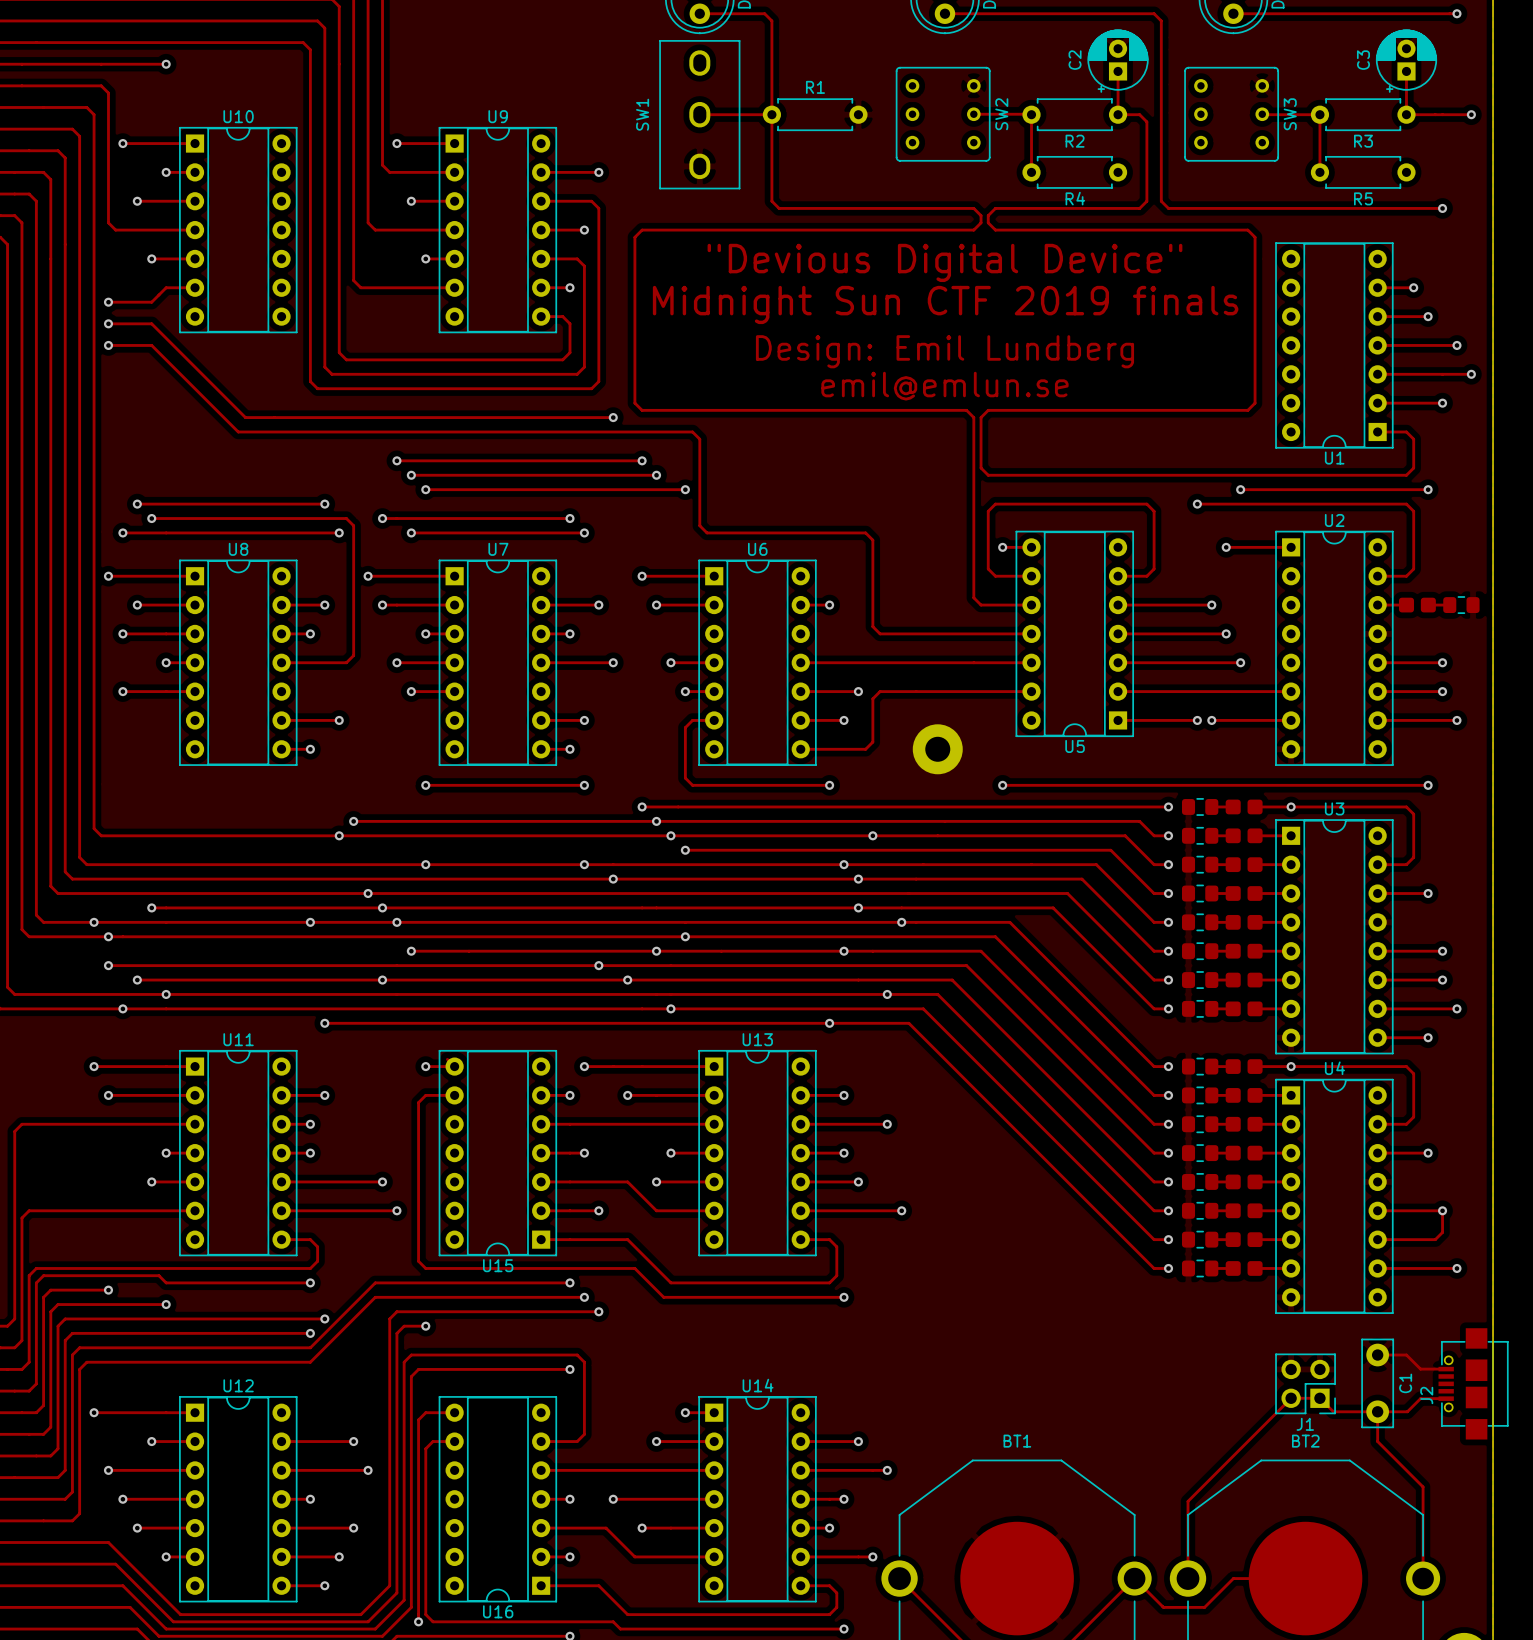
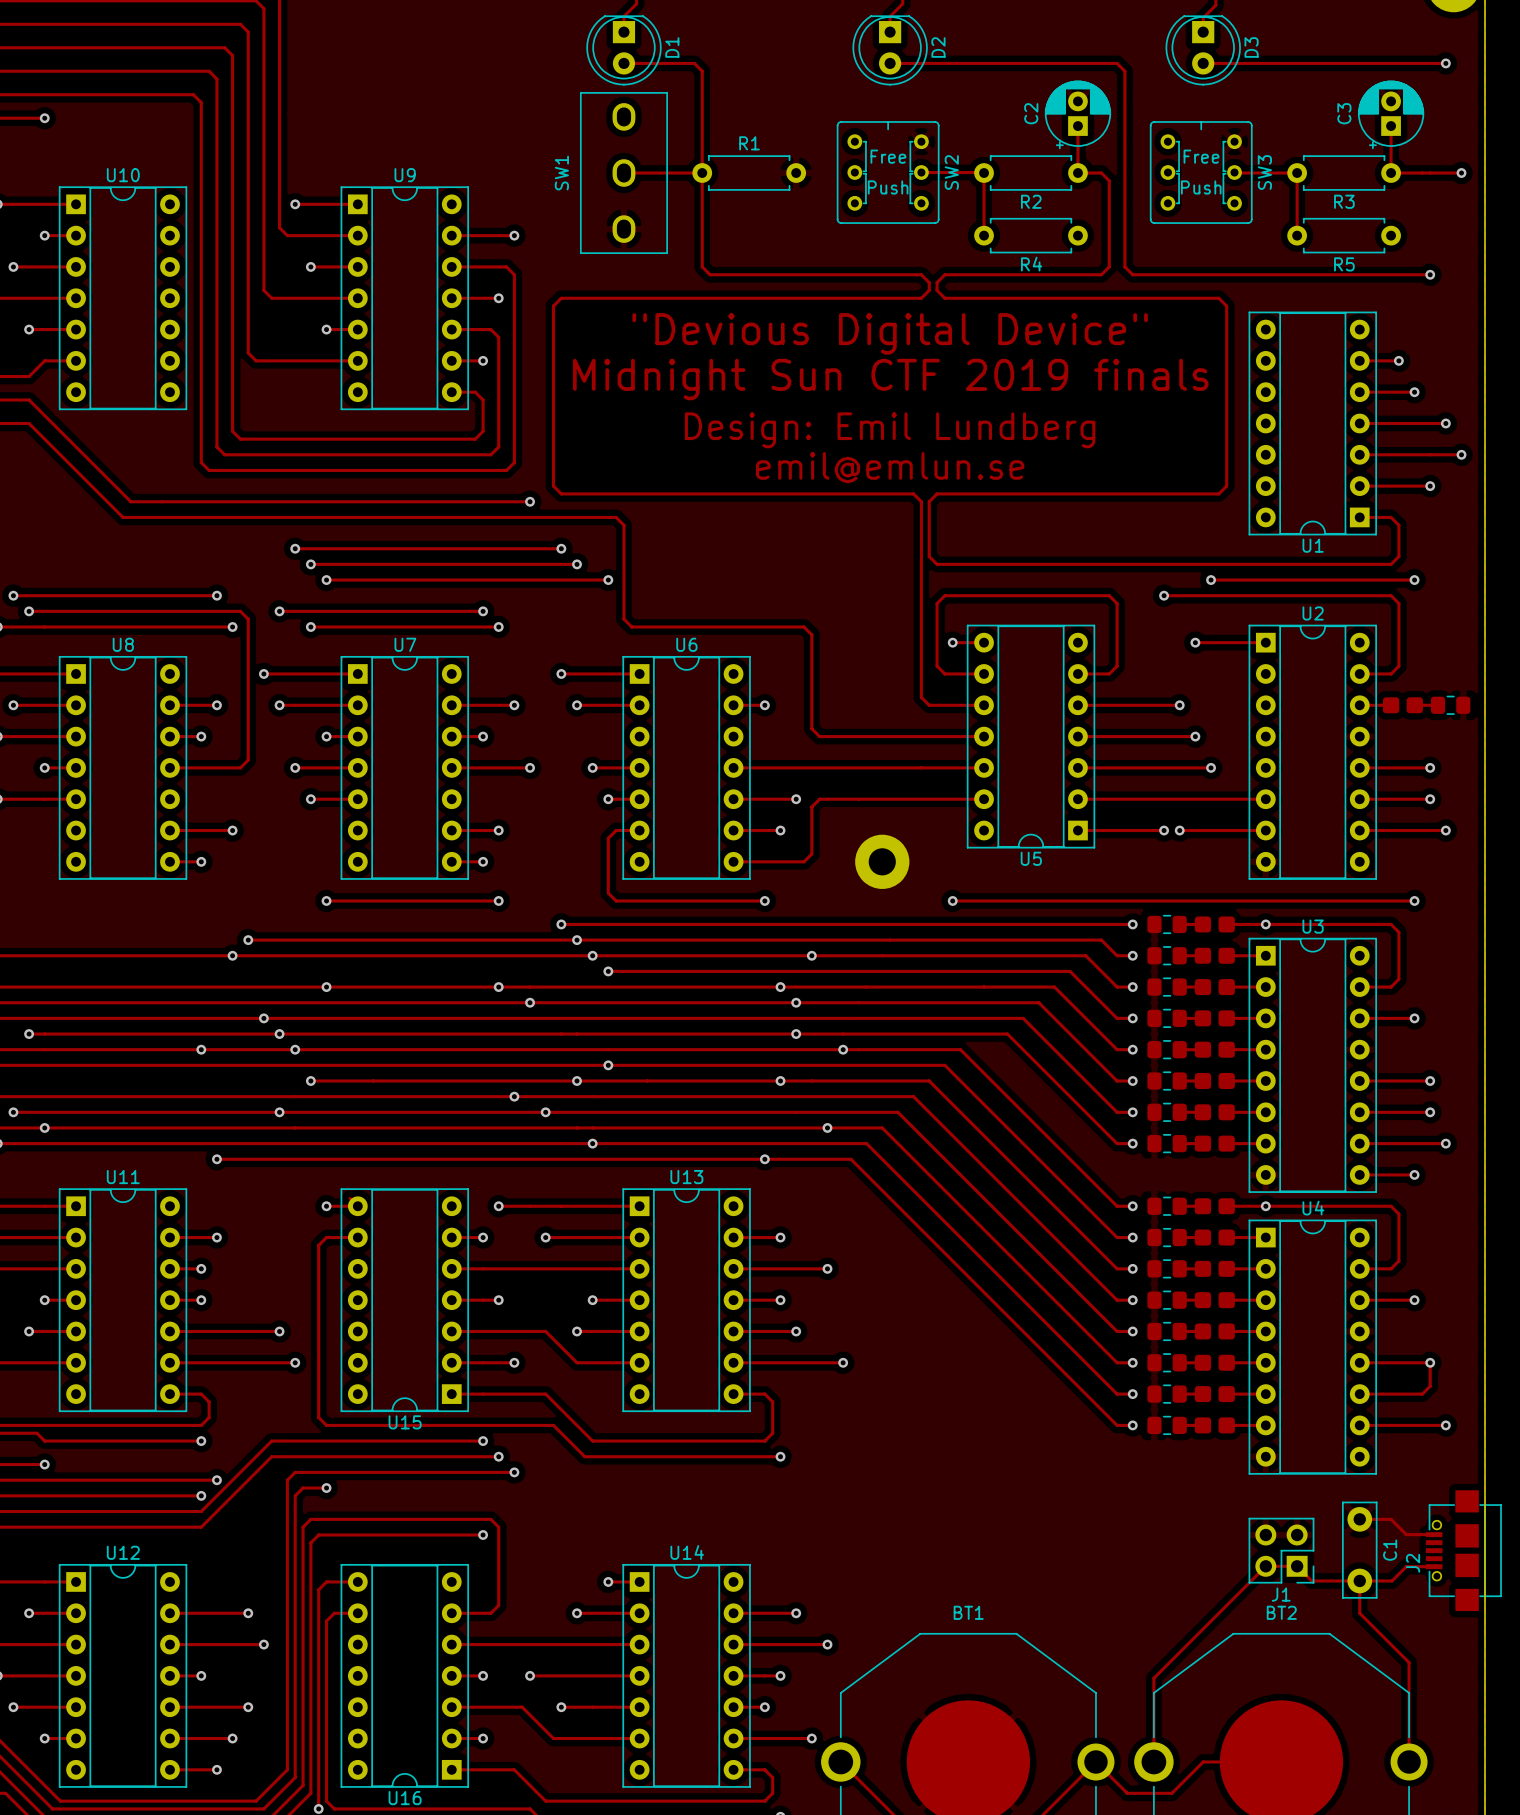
SW2 footprint: [895, 67, 991, 162] -> [836, 121, 940, 224]
SW3 footprint: [1184, 67, 1279, 162] -> [1149, 121, 1253, 224]

